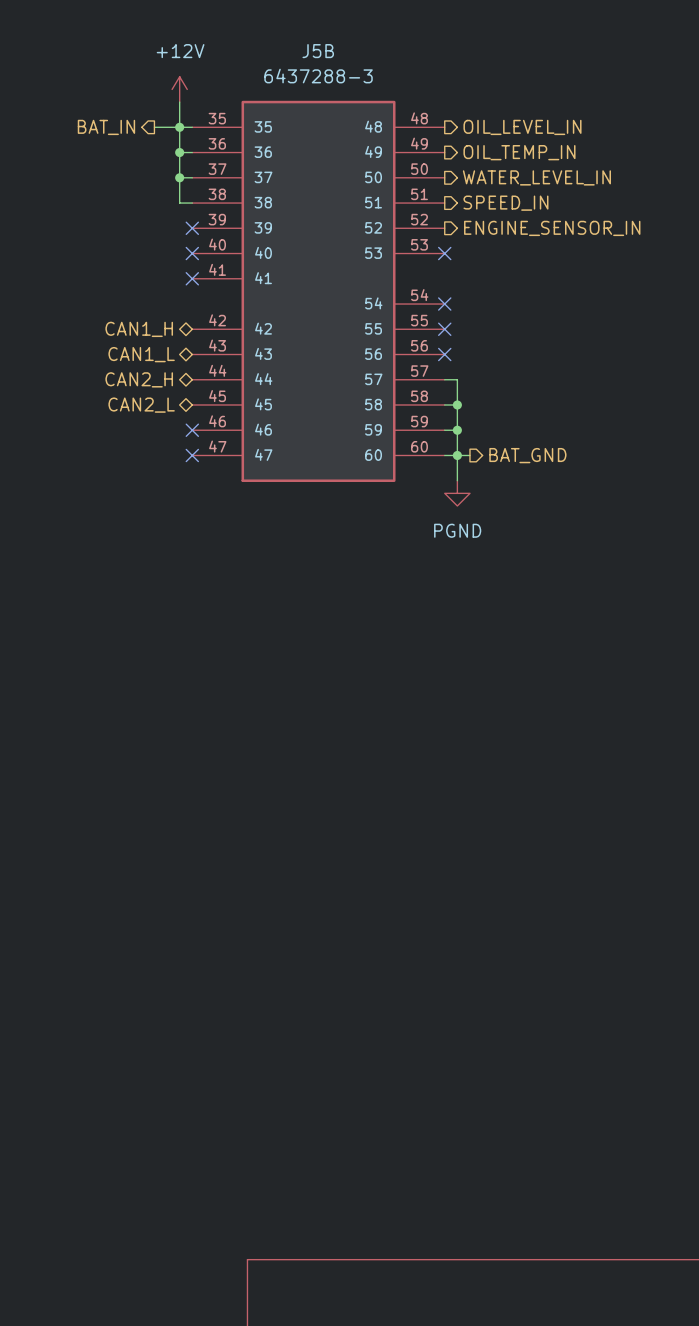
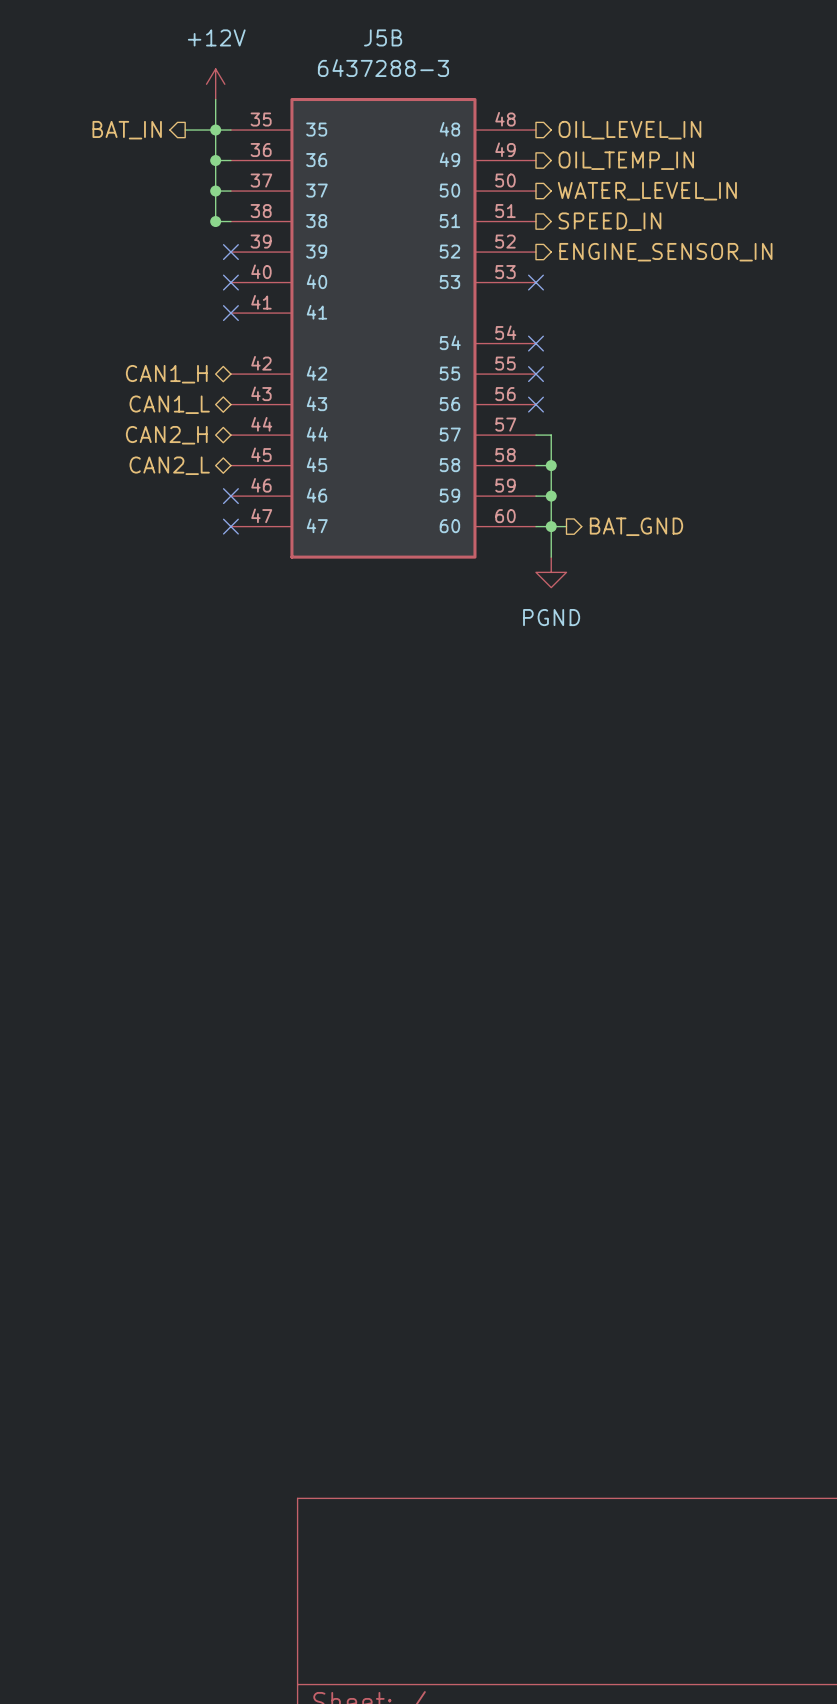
junction: none -> (215, 221)

